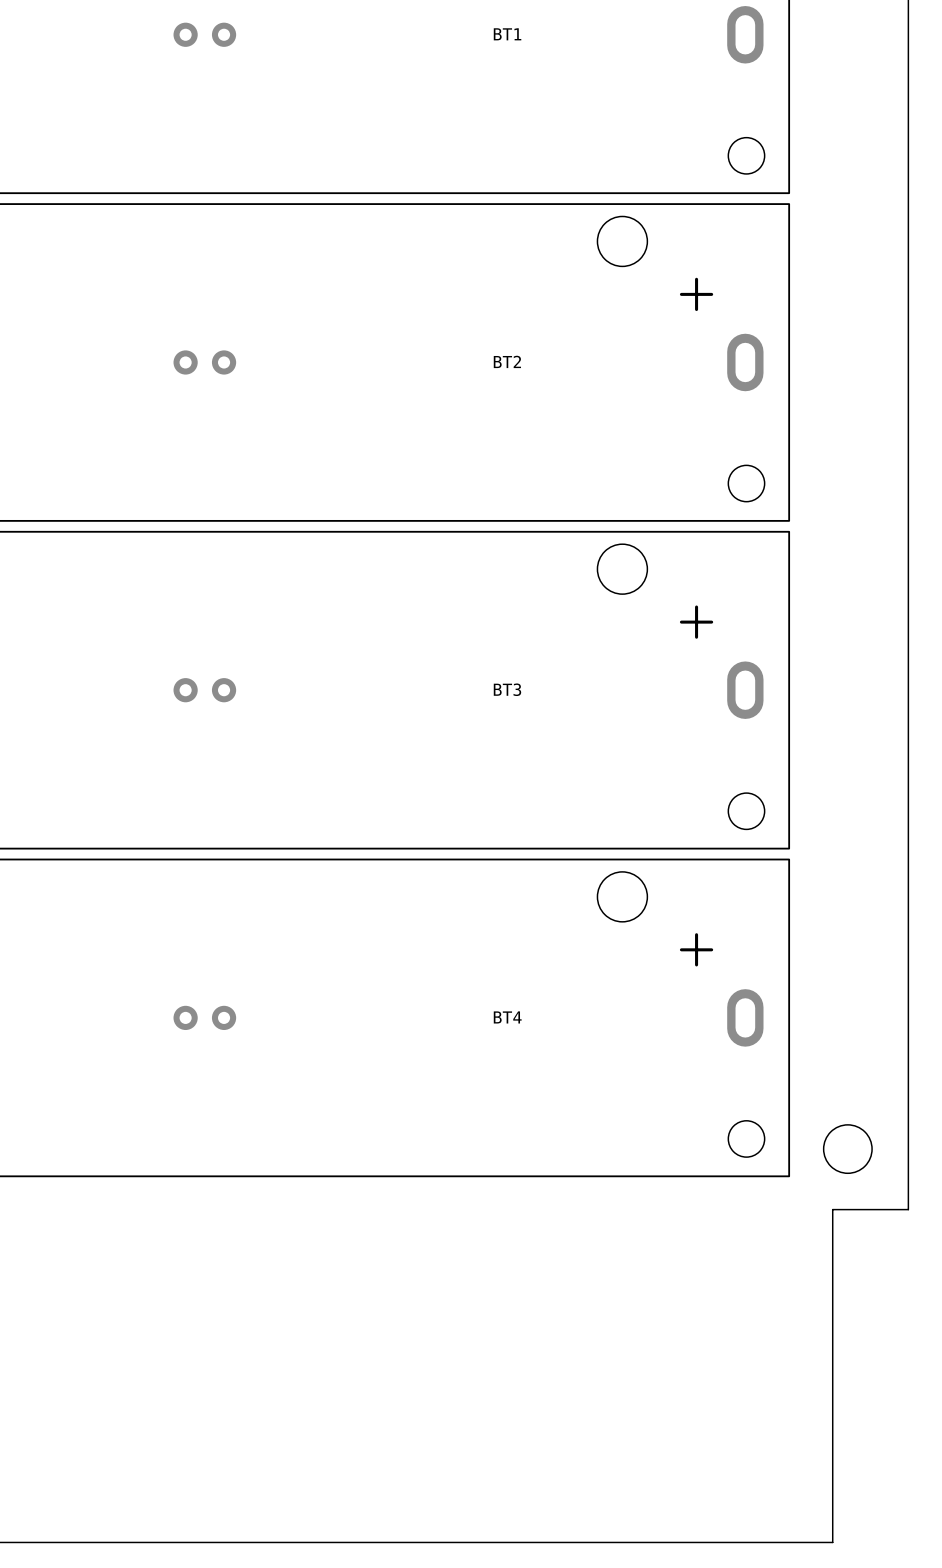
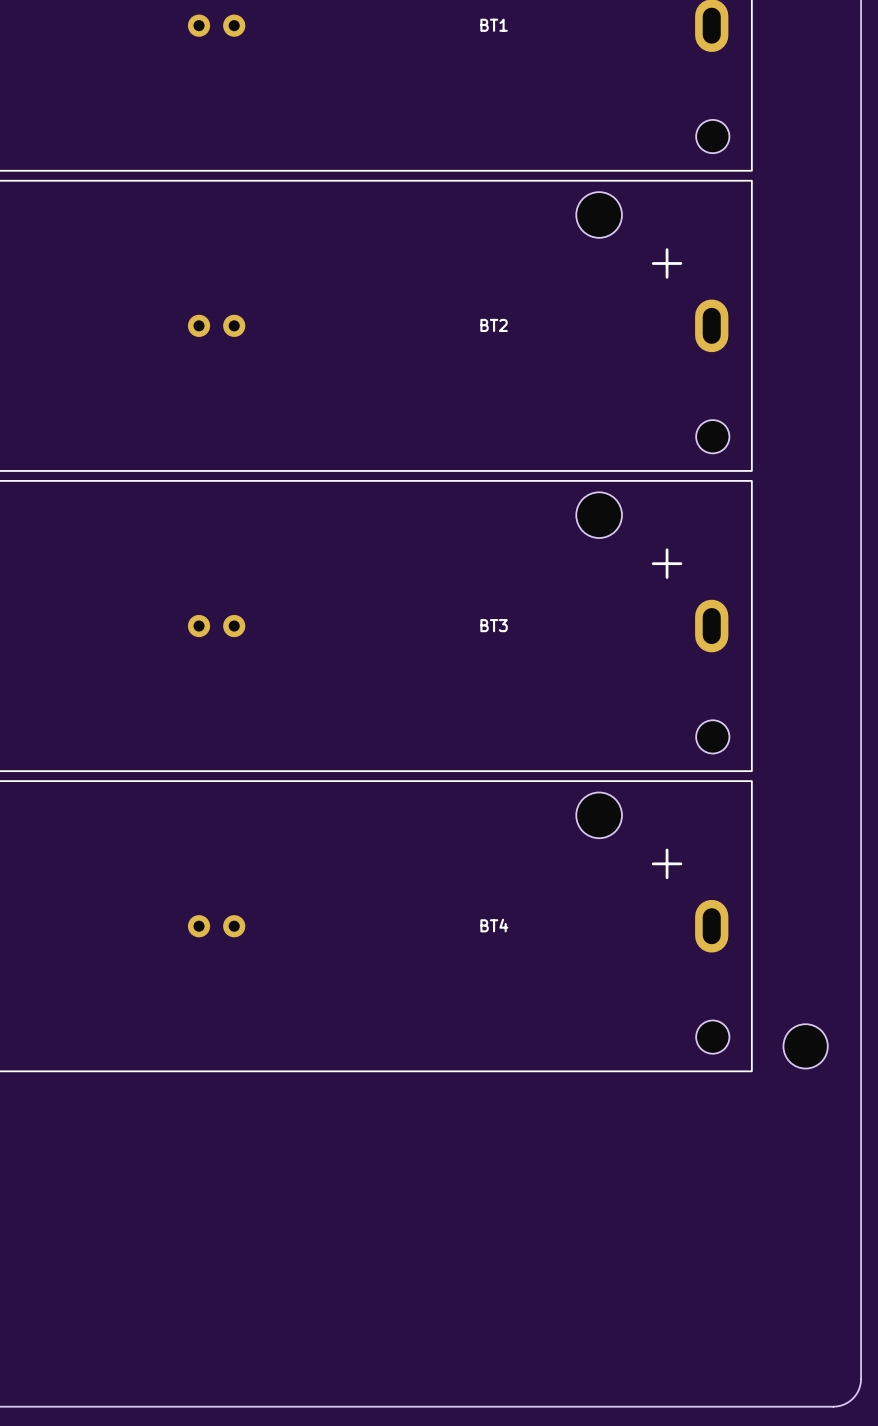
board edge: (908, 1209) (832, 1209) (832, 1542) -> (861, 1101) (860, 1386) (852, 1398) (840, 1405) (791, 1406)

